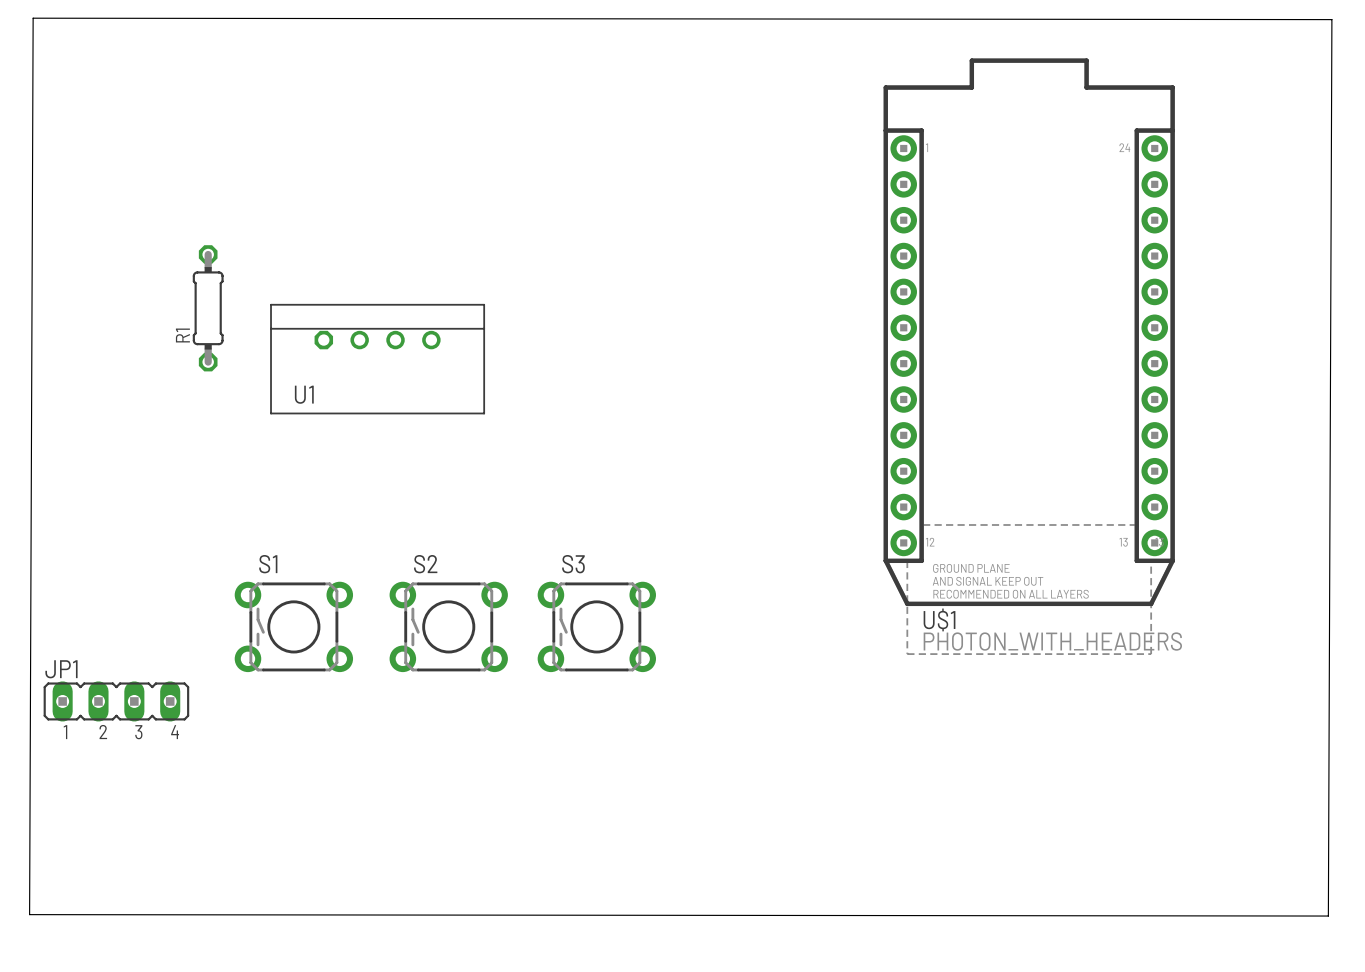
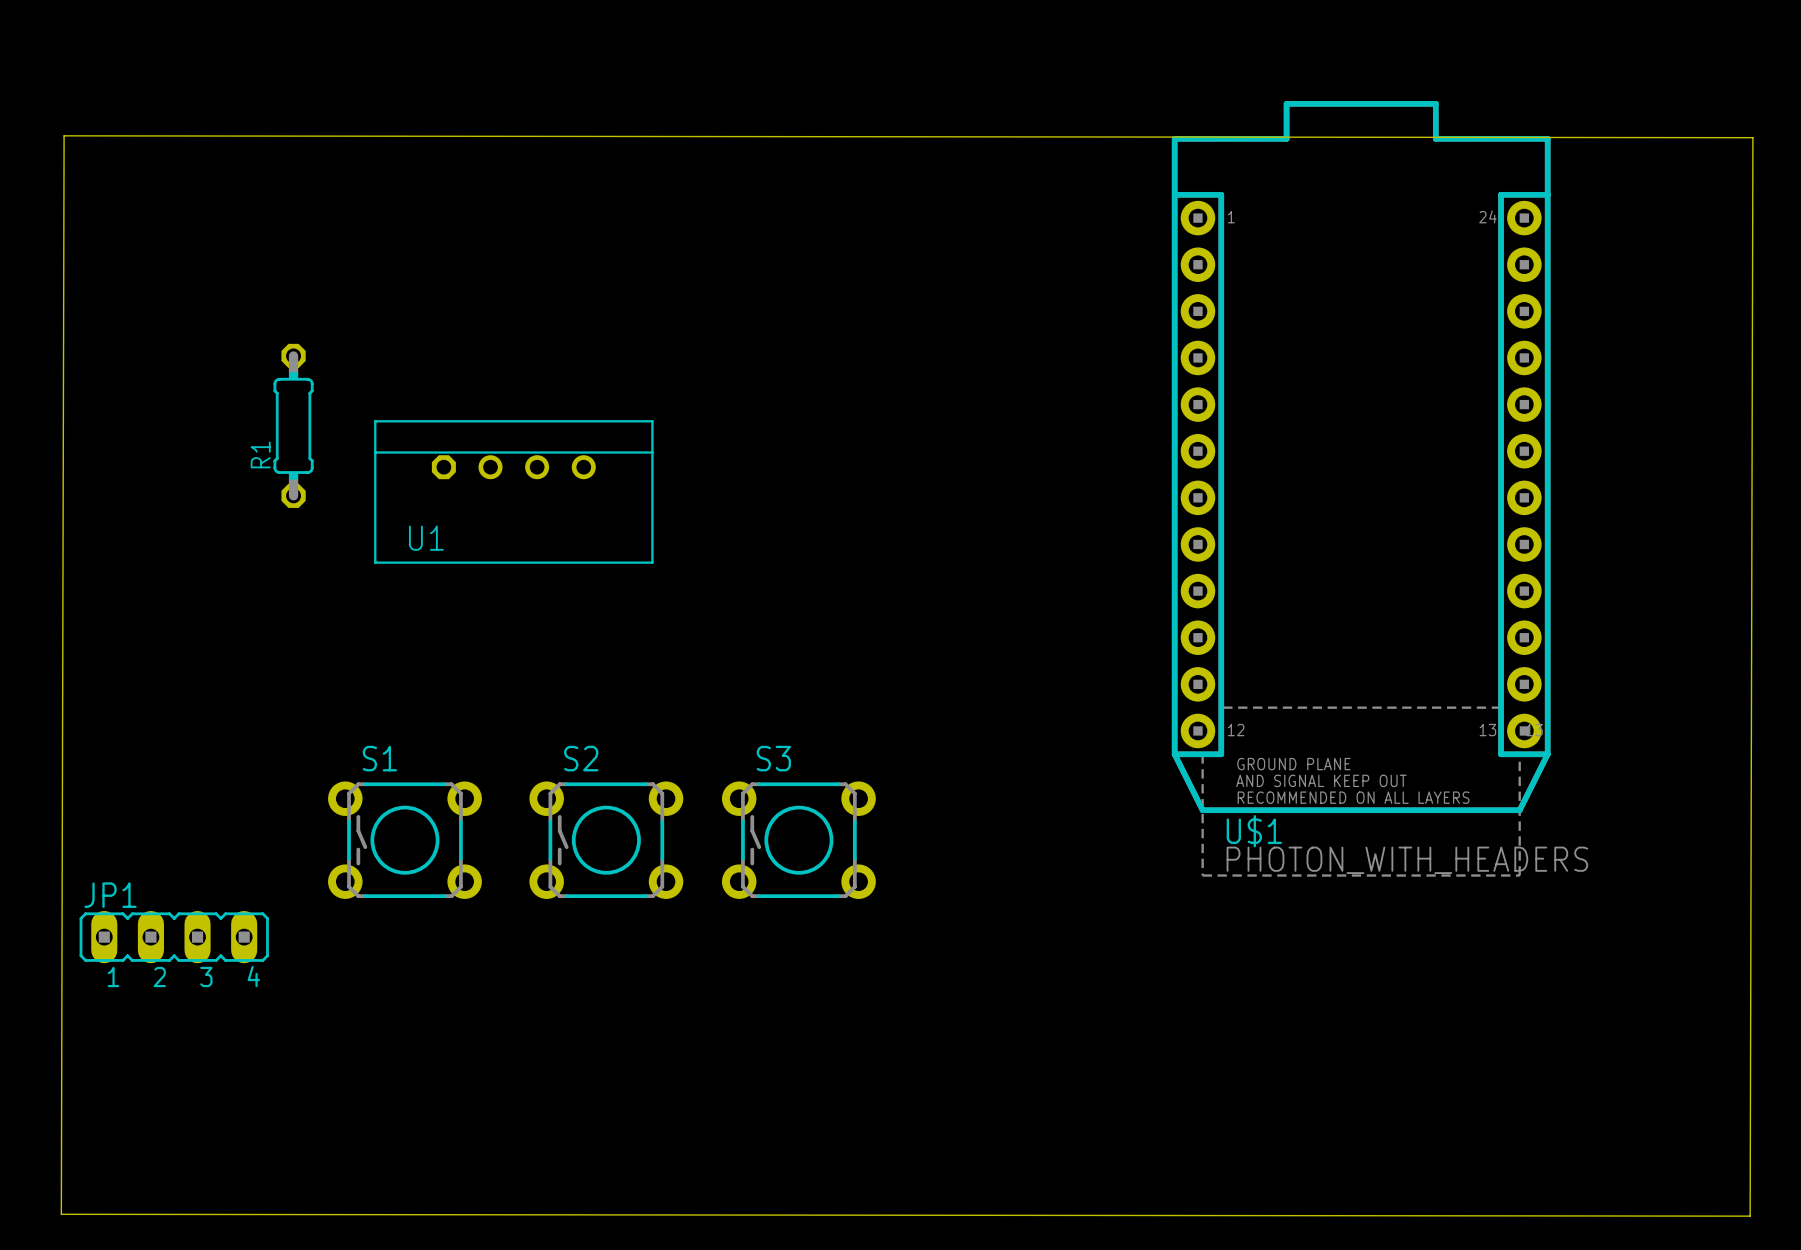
board edge: (29, 914) (33, 18) (1331, 19) (1328, 916) -> (61, 1214) (64, 135) (1752, 137) (1750, 1216)

